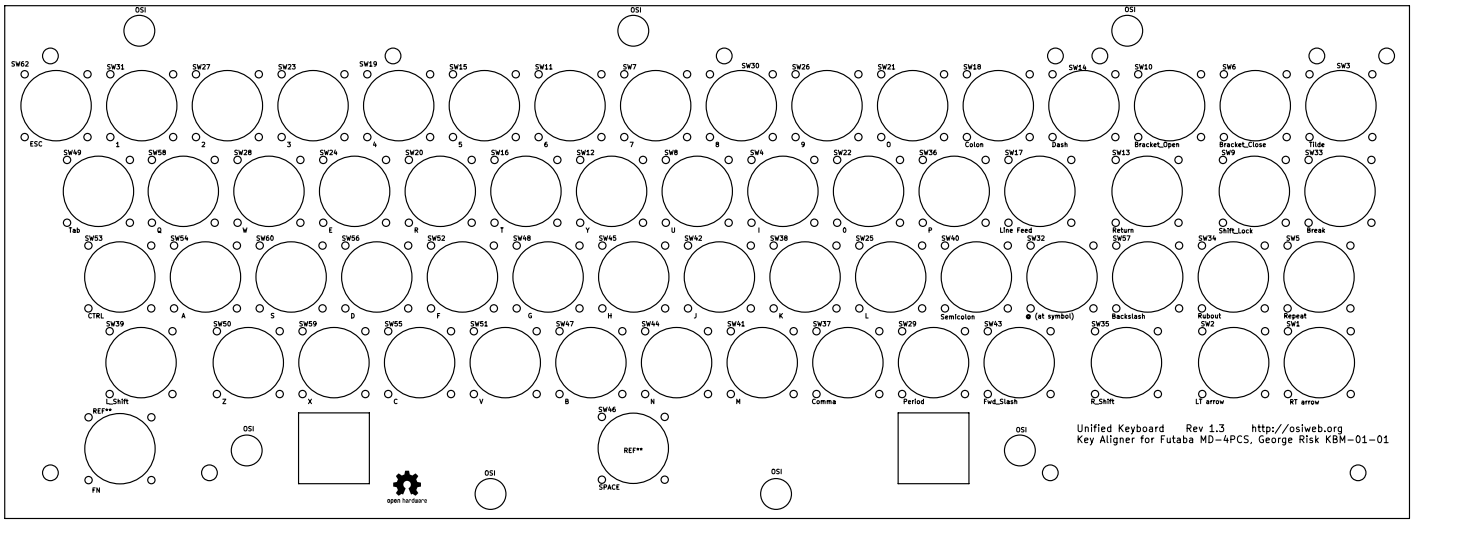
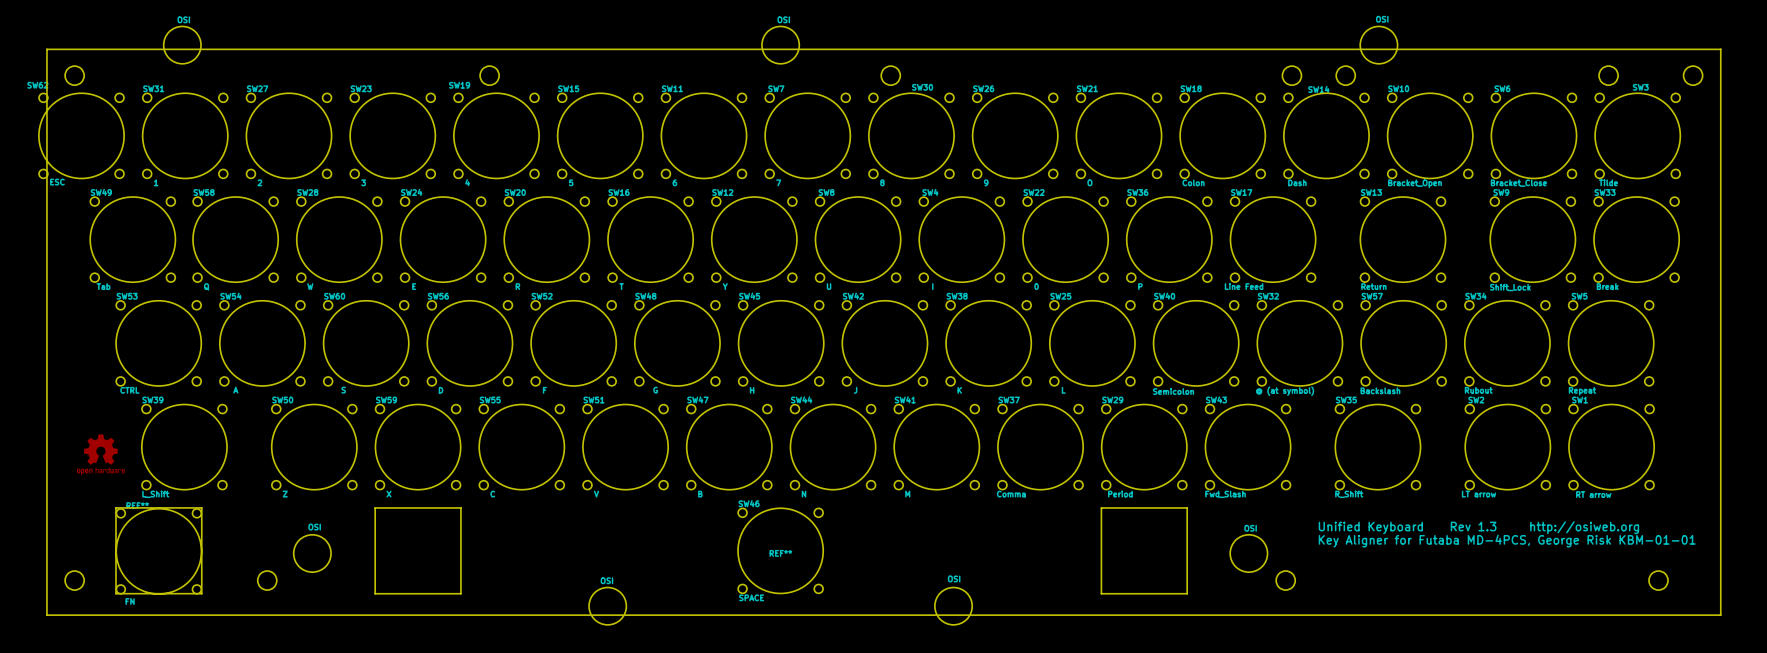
board edge: (1409, 34) (1409, 5) (4, 5) (4, 518) (1409, 518) (1409, 501) -> (1720, 49) (46, 49) (46, 615) (1720, 615)
drawing: none -> [76, 434, 125, 476]
board edge: none -> (115, 507) (201, 507) (201, 593) (115, 593) (115, 507)
drawing: [387, 470, 427, 505] -> none

